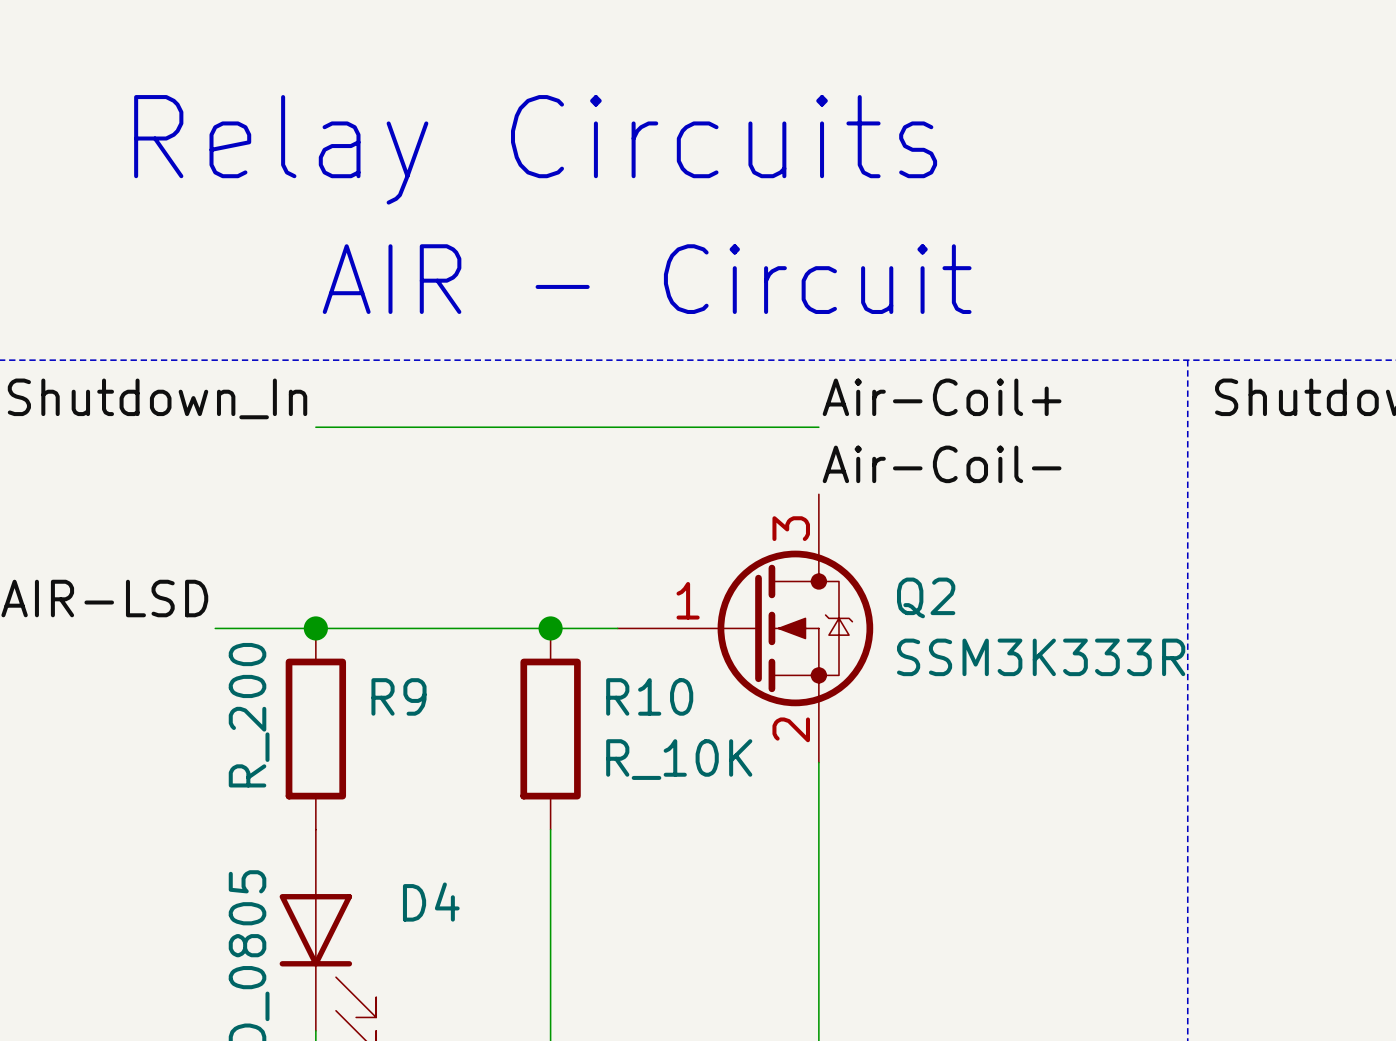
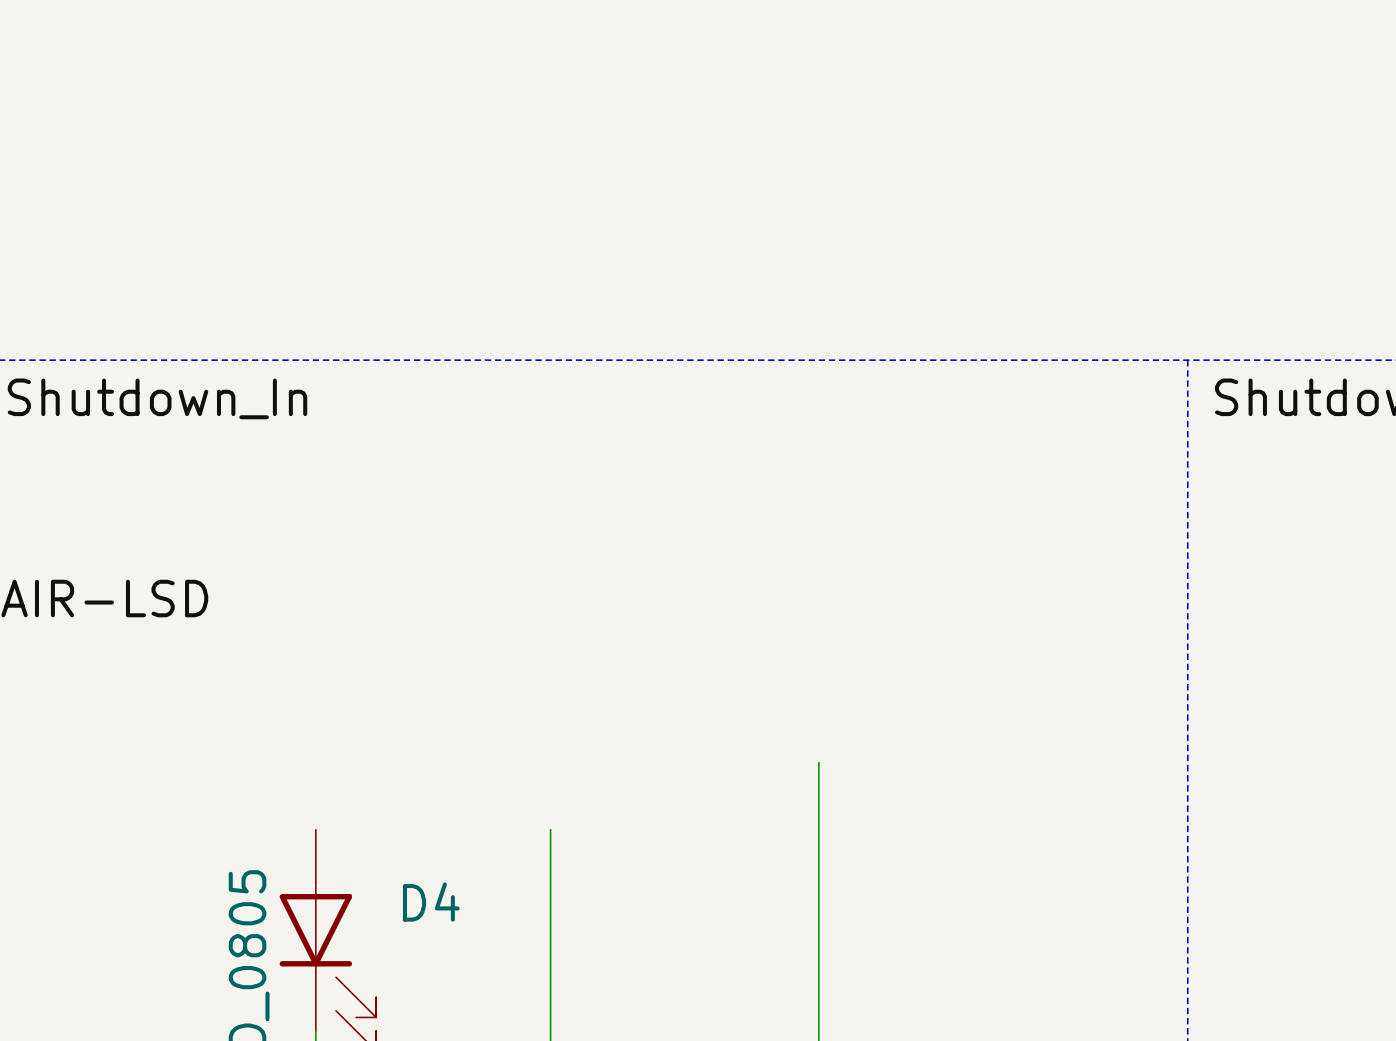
text: Relay Circuits (535, 149) -> none
text: AIR - Circuit (647, 279) -> none
label: Air-Coil+ (942, 397) -> none
wire: (315, 427) (818, 427) -> none
label: Air-Coil- (942, 464) -> none
wire: (215, 628) (617, 628) -> none
junction: (315, 628) -> none
junction: (550, 628) -> none
Q2: SSM3K333R (745, 628) -> none
R9: R_200 (315, 729) -> none
R10: R_10K (550, 729) -> none

